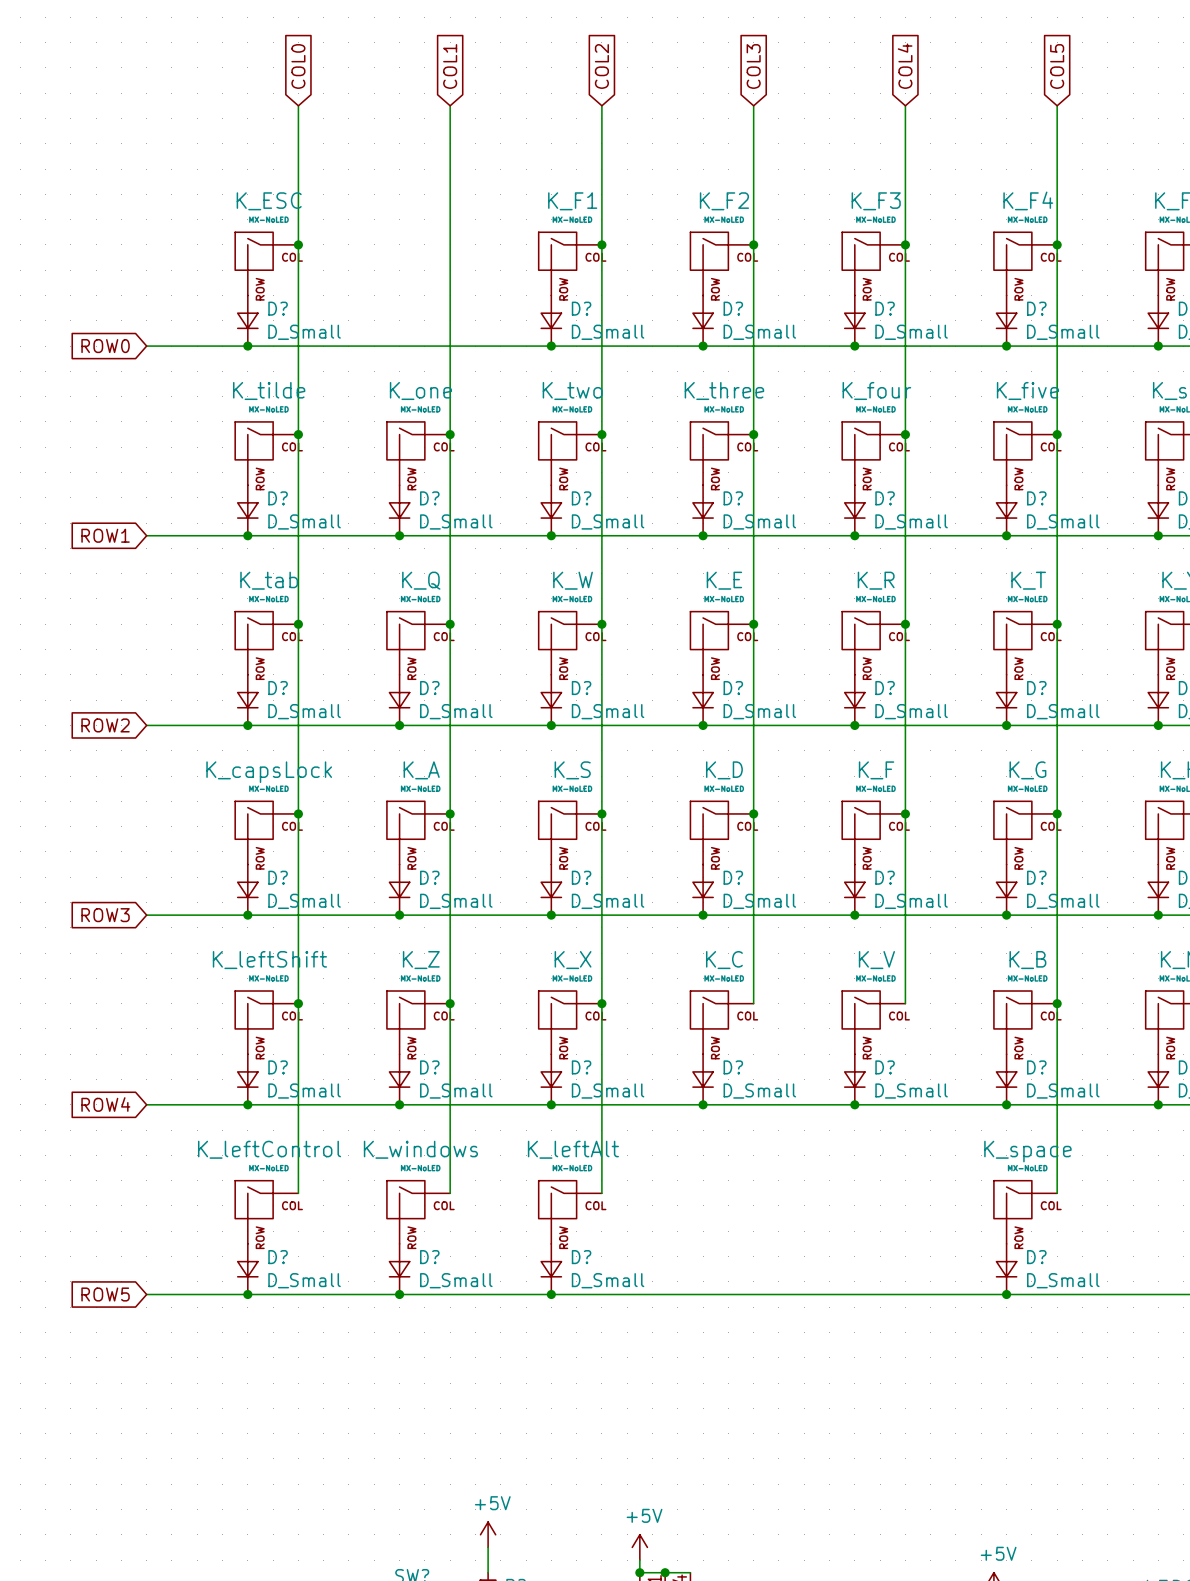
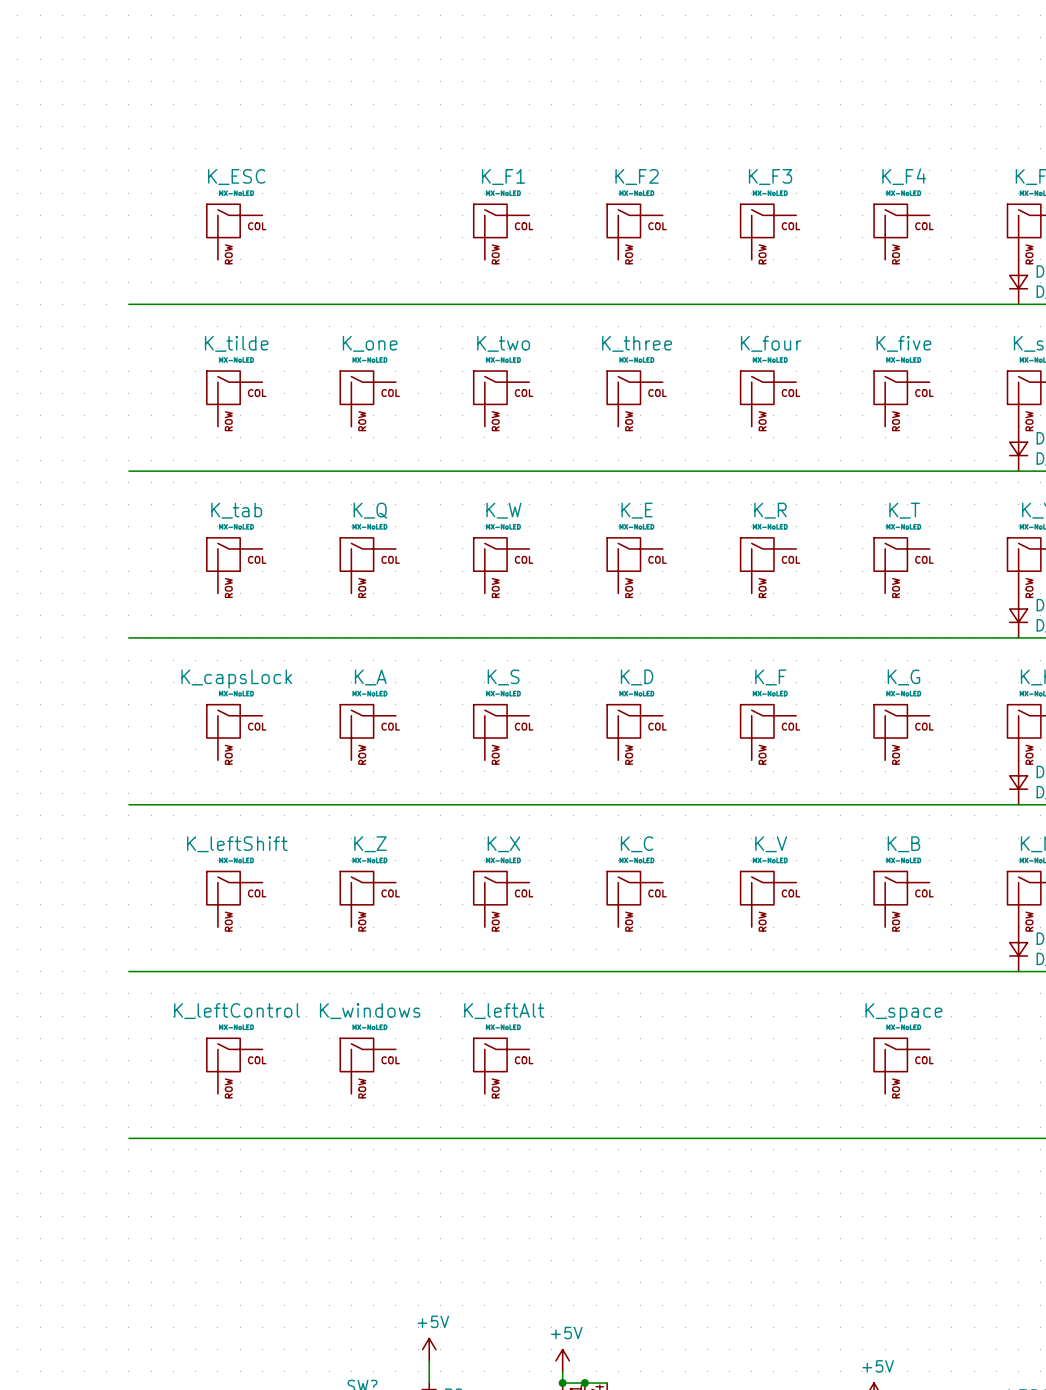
global label: COL0 (298, 66) -> none
global label: COL1 (450, 66) -> none
global label: COL2 (601, 66) -> none
global label: COL3 (753, 66) -> none
global label: COL4 (905, 66) -> none
global label: COL5 (1057, 66) -> none
wire: (298, 105) (298, 1193) -> none
wire: (450, 105) (450, 1193) -> none
wire: (601, 105) (601, 1193) -> none
wire: (753, 105) (753, 1003) -> none
wire: (905, 105) (905, 1003) -> none
wire: (1057, 105) (1057, 1193) -> none
junction: (298, 244) -> none
junction: (601, 244) -> none
junction: (753, 244) -> none
junction: (905, 244) -> none
junction: (1057, 244) -> none
D?: D_Small (247, 320) -> none
D?: D_Small (551, 320) -> none
D?: D_Small (703, 320) -> none
D?: D_Small (854, 320) -> none
D?: D_Small (1006, 320) -> none
global label: ROW0 (105, 346) -> none
junction: (247, 346) -> none
junction: (551, 346) -> none
junction: (703, 346) -> none
junction: (854, 346) -> none
junction: (1006, 346) -> none
junction: (1158, 346) -> none
junction: (298, 434) -> none
junction: (450, 434) -> none
junction: (601, 434) -> none
junction: (753, 434) -> none
junction: (905, 434) -> none
junction: (1057, 434) -> none
D?: D_Small (247, 510) -> none
D?: D_Small (399, 510) -> none
D?: D_Small (551, 510) -> none
D?: D_Small (703, 510) -> none
D?: D_Small (854, 510) -> none
D?: D_Small (1006, 510) -> none
global label: ROW1 (105, 535) -> none
junction: (247, 535) -> none
junction: (399, 535) -> none
junction: (551, 535) -> none
junction: (703, 535) -> none
junction: (854, 535) -> none
junction: (1006, 535) -> none
junction: (1158, 535) -> none
junction: (298, 624) -> none
junction: (450, 624) -> none
junction: (601, 624) -> none
junction: (753, 624) -> none
junction: (905, 624) -> none
junction: (1057, 624) -> none
D?: D_Small (247, 700) -> none
D?: D_Small (399, 700) -> none
D?: D_Small (551, 700) -> none
D?: D_Small (703, 700) -> none
D?: D_Small (854, 700) -> none
D?: D_Small (1006, 700) -> none
global label: ROW2 (105, 725) -> none
junction: (247, 725) -> none
junction: (399, 725) -> none
junction: (551, 725) -> none
junction: (703, 725) -> none
junction: (854, 725) -> none
junction: (1006, 725) -> none
junction: (1158, 725) -> none
junction: (298, 813) -> none
junction: (450, 813) -> none
junction: (601, 813) -> none
junction: (753, 813) -> none
junction: (905, 813) -> none
junction: (1057, 813) -> none
D?: D_Small (247, 889) -> none
D?: D_Small (399, 889) -> none
D?: D_Small (551, 889) -> none
D?: D_Small (703, 889) -> none
D?: D_Small (854, 889) -> none
D?: D_Small (1006, 889) -> none
global label: ROW3 (105, 915) -> none
junction: (247, 915) -> none
junction: (399, 915) -> none
junction: (551, 915) -> none
junction: (703, 915) -> none
junction: (854, 915) -> none
junction: (1006, 915) -> none
junction: (1158, 915) -> none
junction: (298, 1003) -> none
junction: (450, 1003) -> none
junction: (601, 1003) -> none
junction: (1057, 1003) -> none
D?: D_Small (247, 1079) -> none
D?: D_Small (399, 1079) -> none
D?: D_Small (551, 1079) -> none
D?: D_Small (703, 1079) -> none
D?: D_Small (854, 1079) -> none
D?: D_Small (1006, 1079) -> none
global label: ROW4 (105, 1104) -> none
junction: (247, 1104) -> none
junction: (399, 1104) -> none
junction: (551, 1104) -> none
junction: (703, 1104) -> none
junction: (854, 1104) -> none
junction: (1006, 1104) -> none
junction: (1158, 1104) -> none
D?: D_Small (247, 1269) -> none
D?: D_Small (399, 1269) -> none
D?: D_Small (551, 1269) -> none
D?: D_Small (1006, 1269) -> none
global label: ROW5 (105, 1294) -> none
junction: (247, 1294) -> none
junction: (399, 1294) -> none
junction: (551, 1294) -> none
junction: (1006, 1294) -> none

